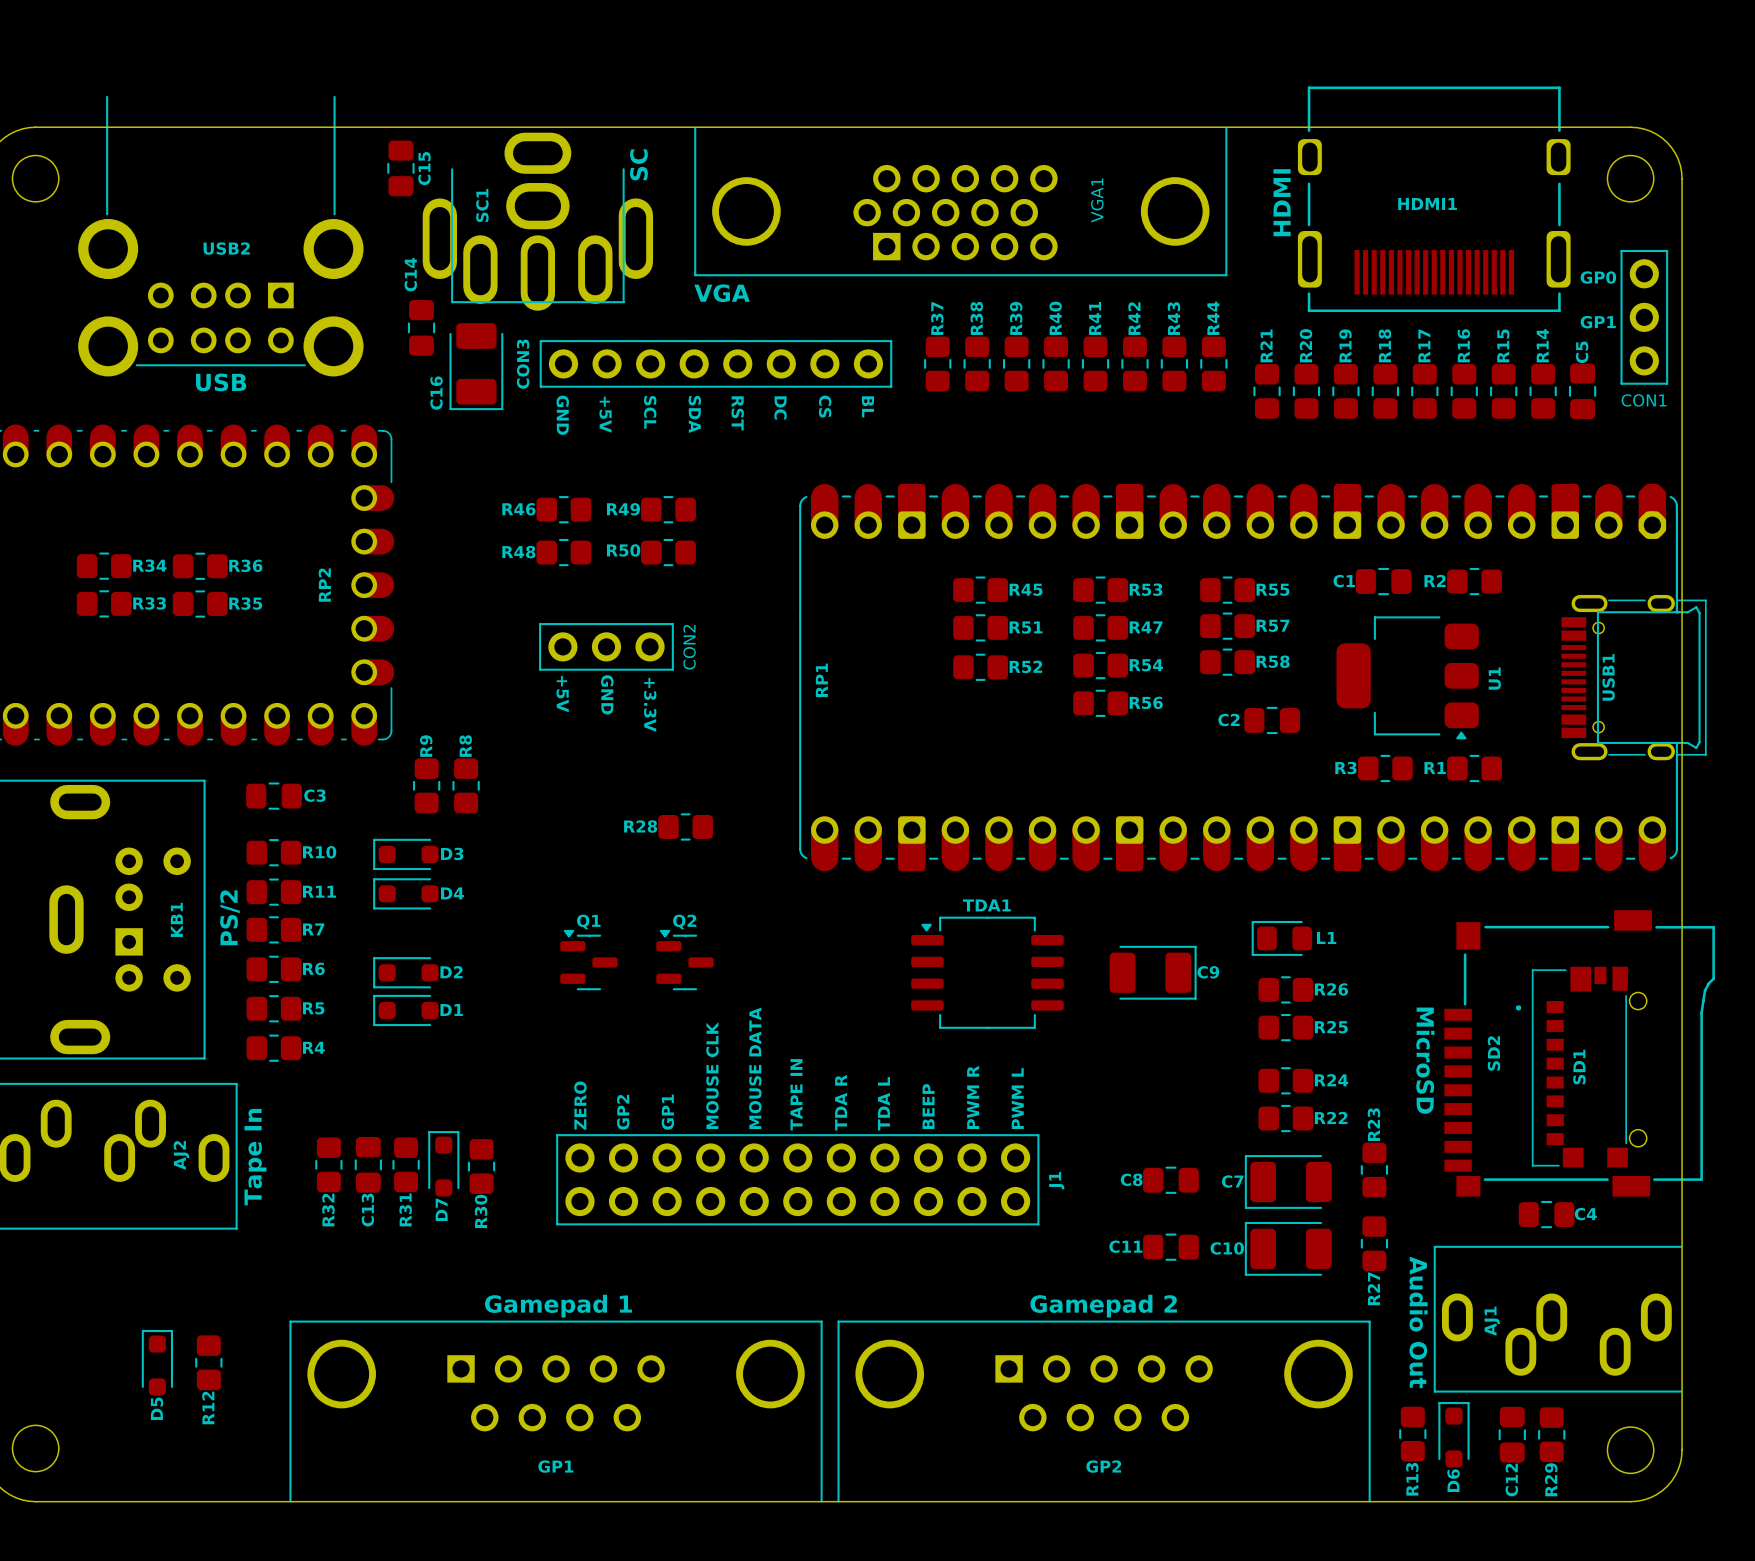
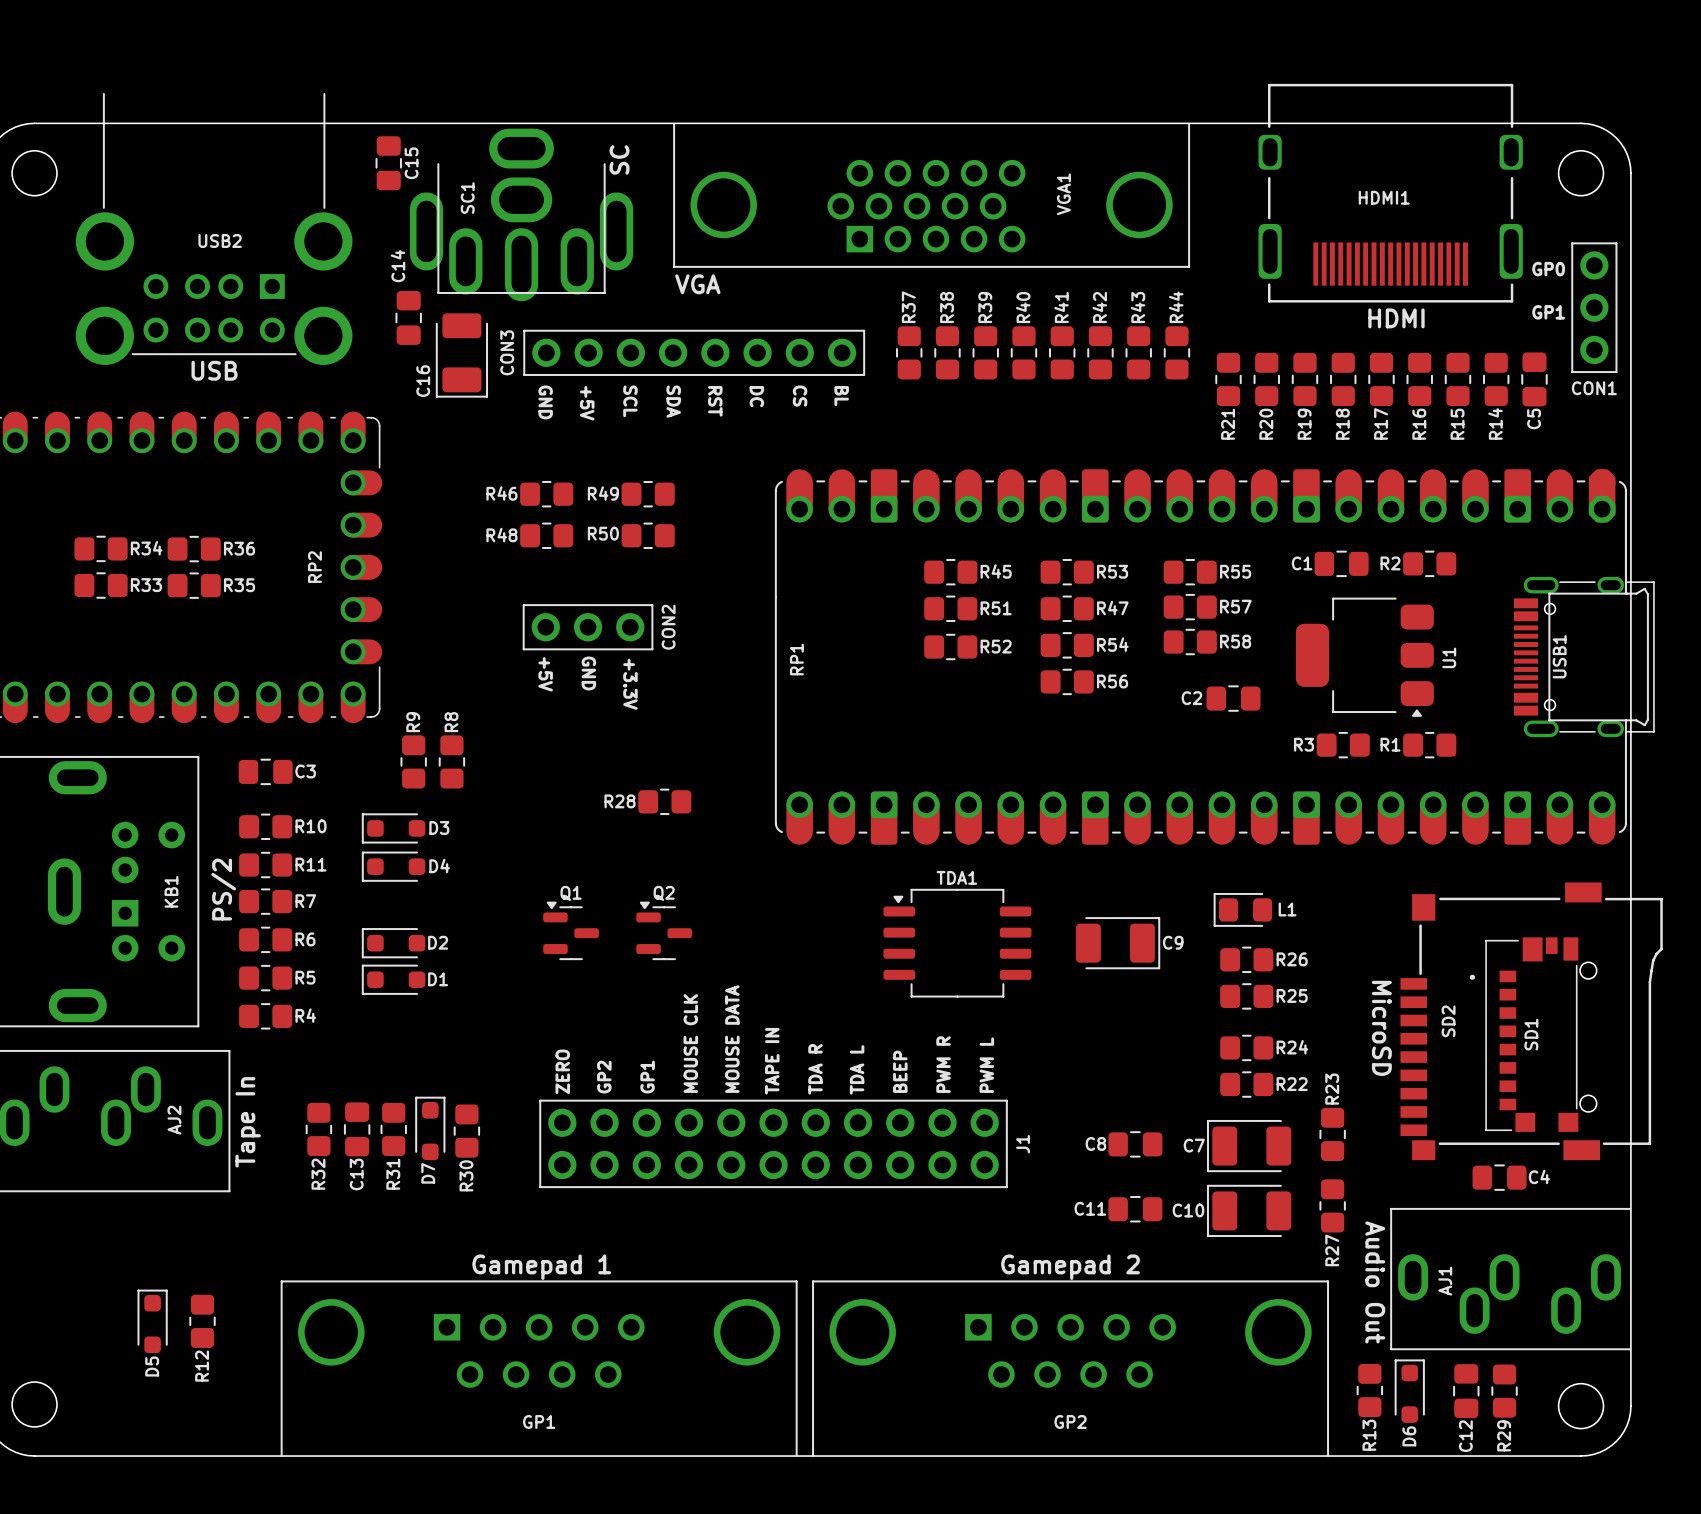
text rotation: 0° (1282, 202) -> 90° clockwise (1396, 318)
text position: HDMI (1282, 202) -> HDMI (1396, 318)
R21 name position: R21 (1266, 345) -> R21 (1228, 424)
R20 name position: R20 (1306, 345) -> R20 (1266, 424)
R19 name position: R19 (1345, 345) -> R19 (1304, 424)
R18 name position: R18 (1384, 345) -> R18 (1342, 424)
R16 name position: R16 (1463, 345) -> R16 (1419, 424)
R15 name position: R15 (1503, 345) -> R15 (1457, 424)
R14 name position: R14 (1542, 345) -> R14 (1495, 423)
R17 name position: R17 (1424, 346) -> R17 (1381, 423)
C5 name position: C5 (1582, 352) -> C5 (1534, 418)

